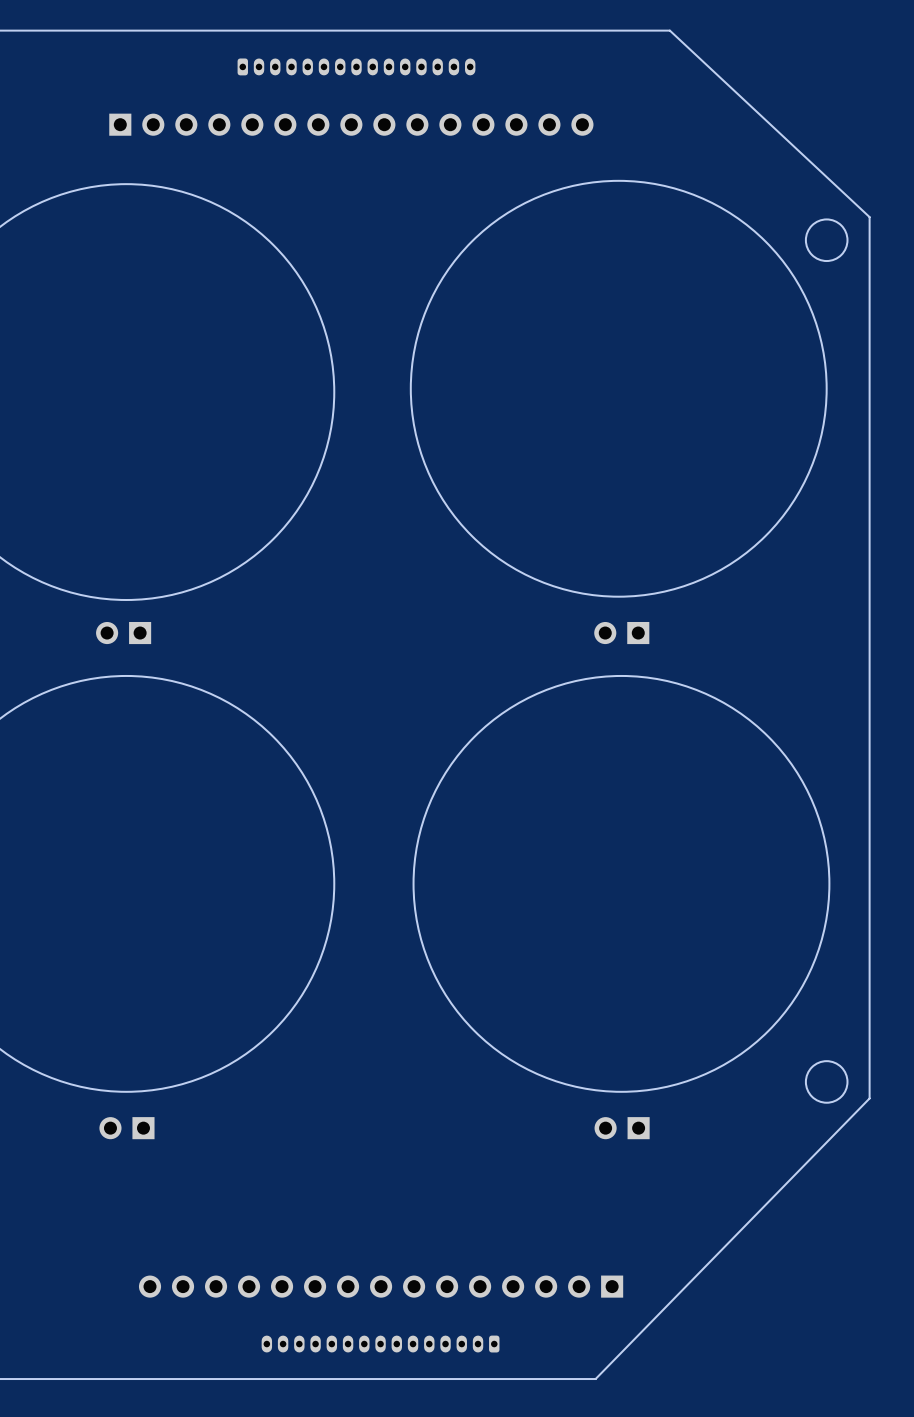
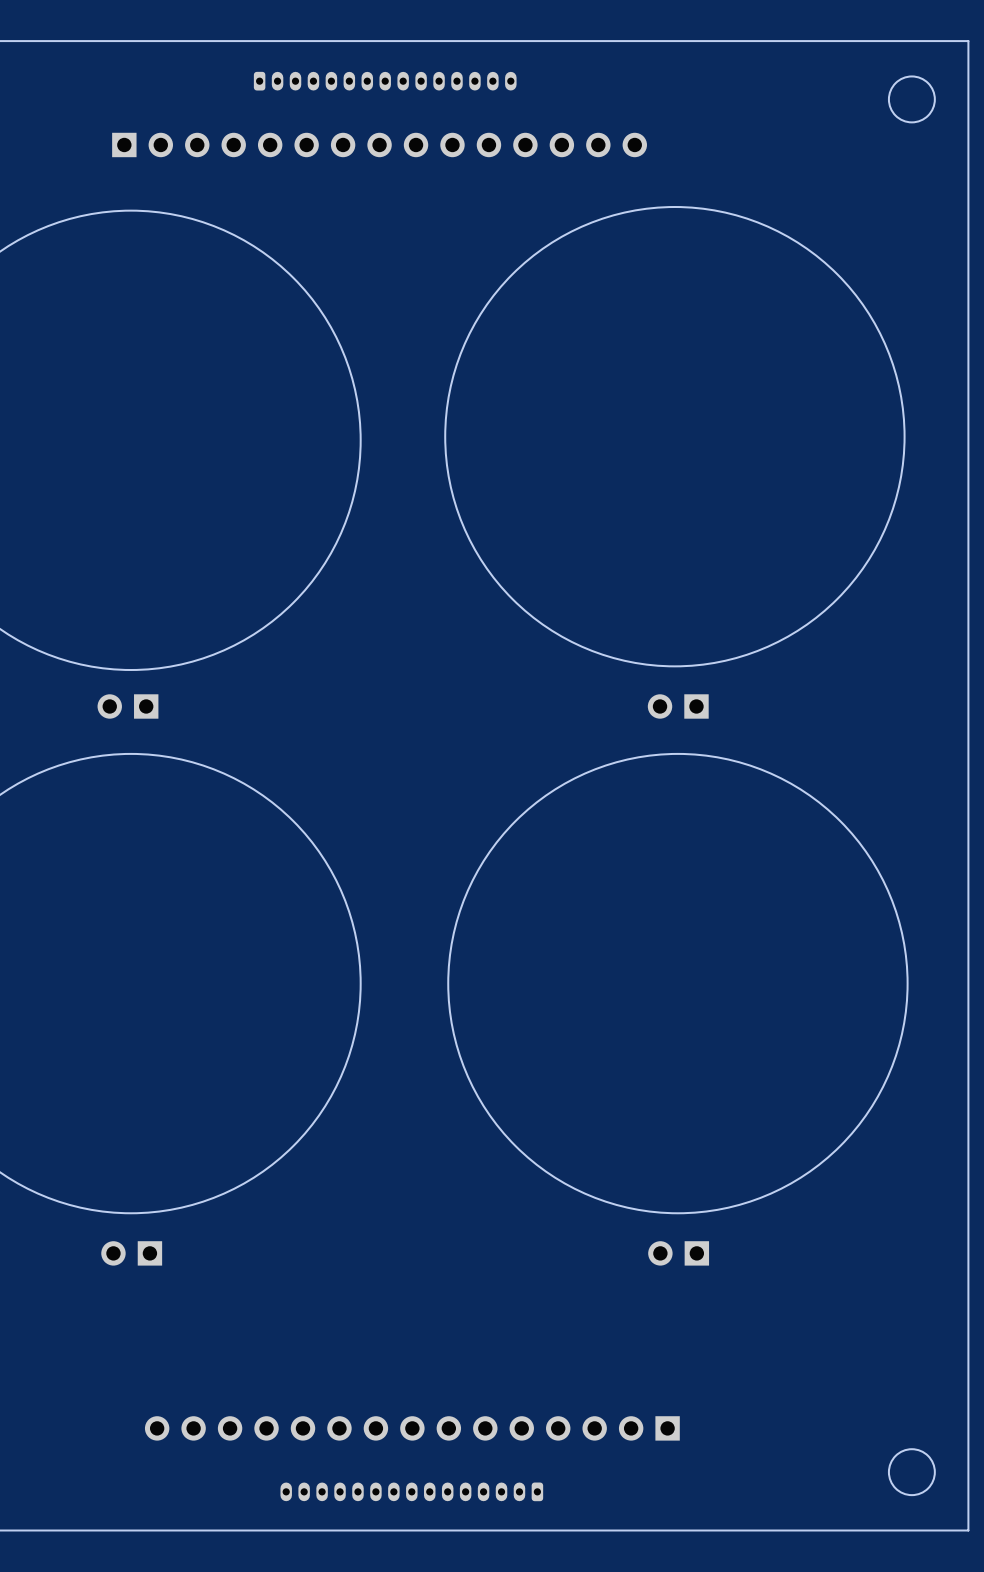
board edge: (669, 30) (869, 217) (869, 1098) (595, 1379) -> (731, 41) (968, 41) (968, 1530) (649, 1530)
round board edge position: (826, 240) -> (911, 99)
round board edge position: (826, 1081) -> (911, 1472)

